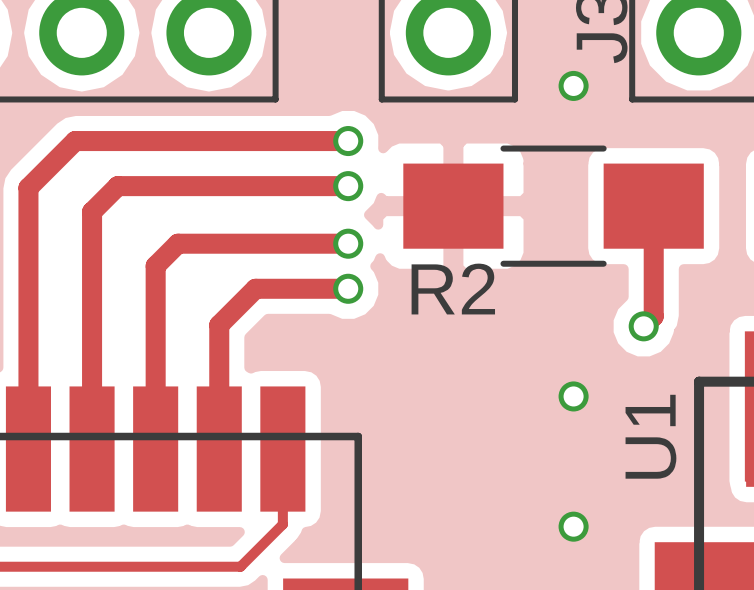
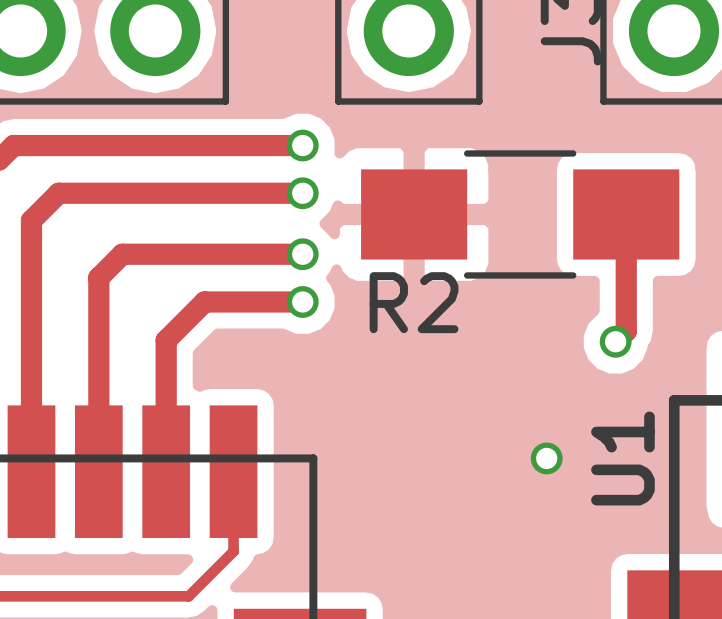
part: (573, 85) -> none
part position: (573, 396) -> (546, 458)
part: (573, 526) -> none

